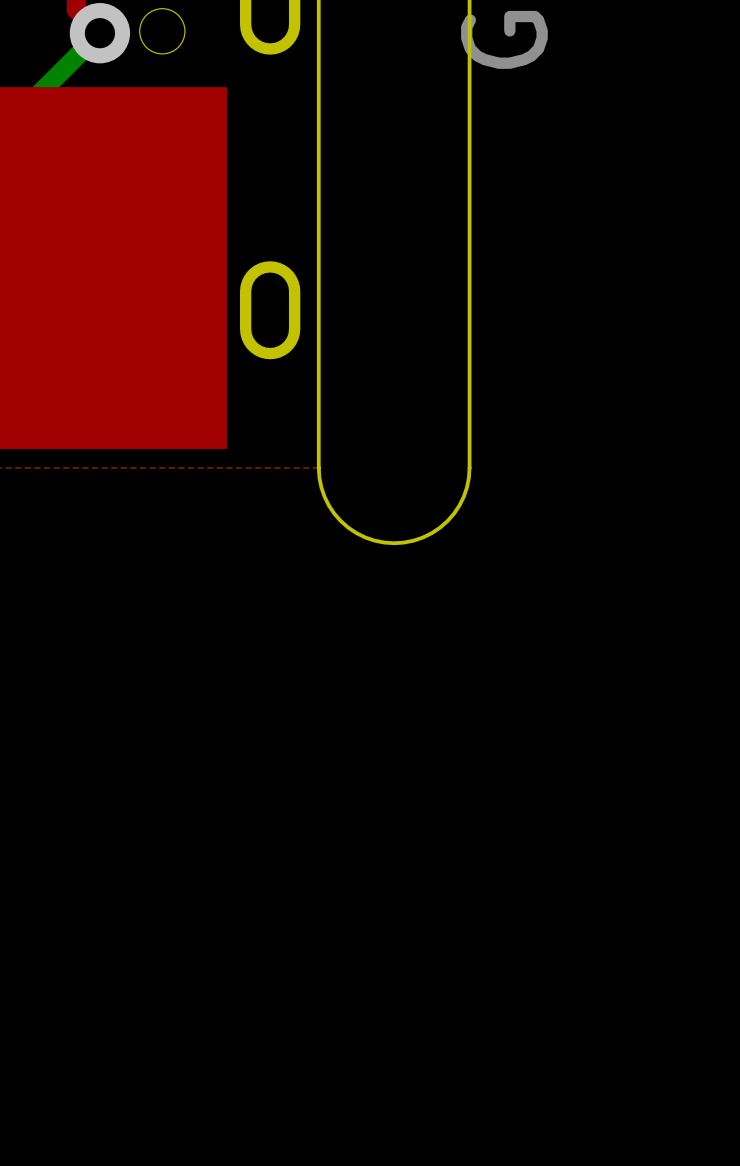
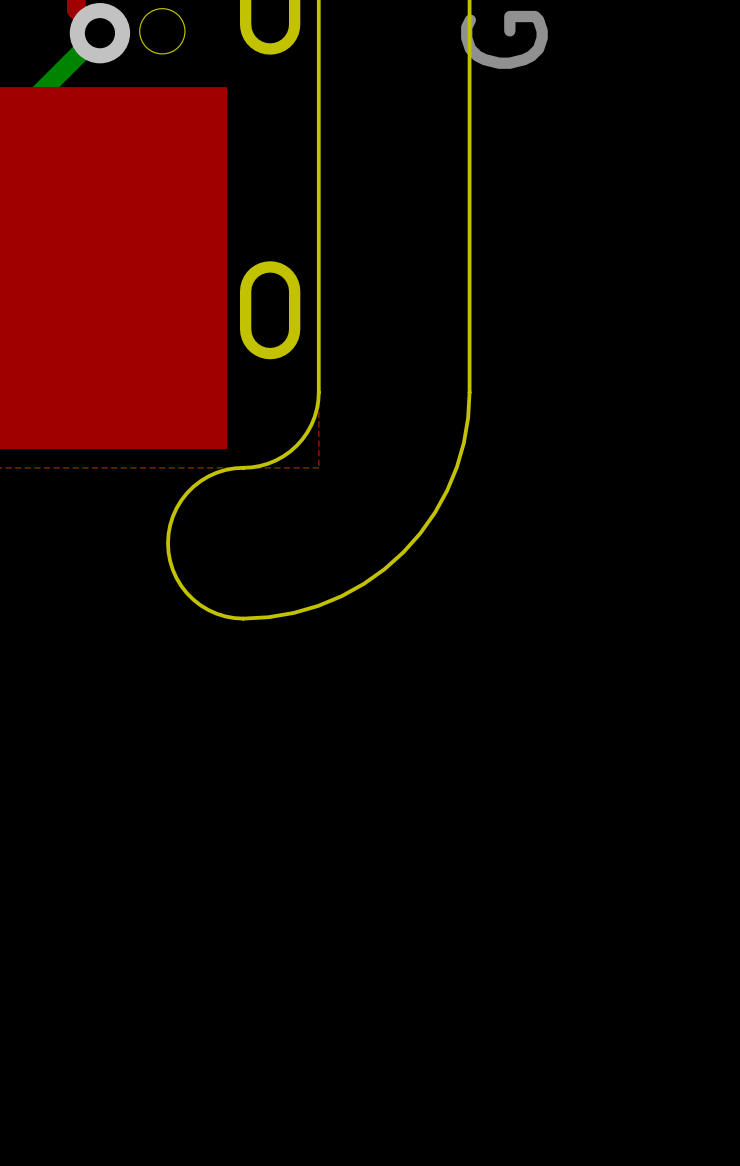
board edge: (318, 392) (319, 477) (328, 505) (340, 521) (356, 533) (374, 540) (394, 543) (413, 540) (431, 533) (447, 521) (459, 505) (468, 477) (469, 392) -> (318, 392) (316, 409) (311, 425) (302, 439) (290, 451) (268, 463) (225, 470) (208, 476) (193, 486) (176, 508) (168, 534) (170, 561) (176, 578) (186, 593) (208, 609) (225, 616) (243, 618) (293, 612) (341, 596) (384, 569) (420, 533) (447, 490) (463, 442) (469, 392)

